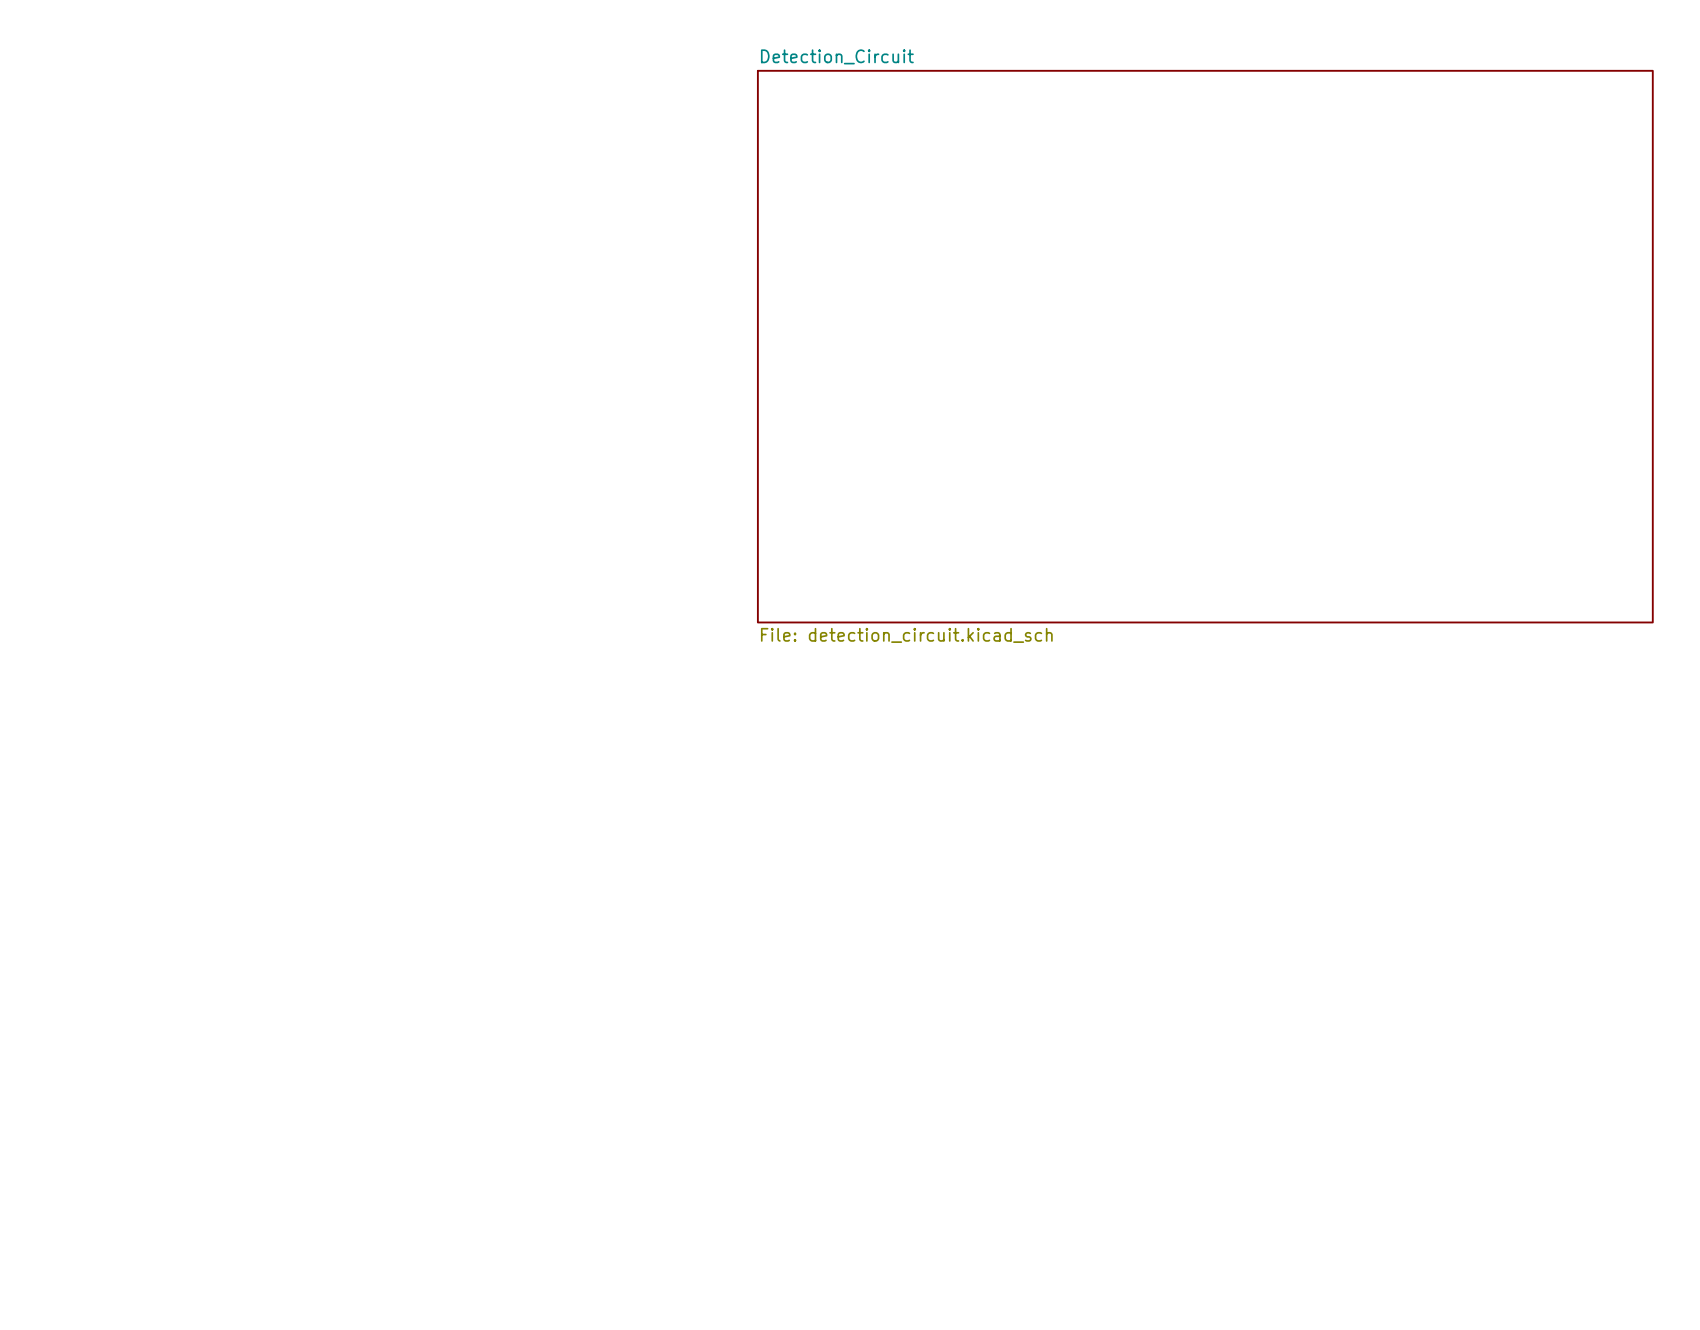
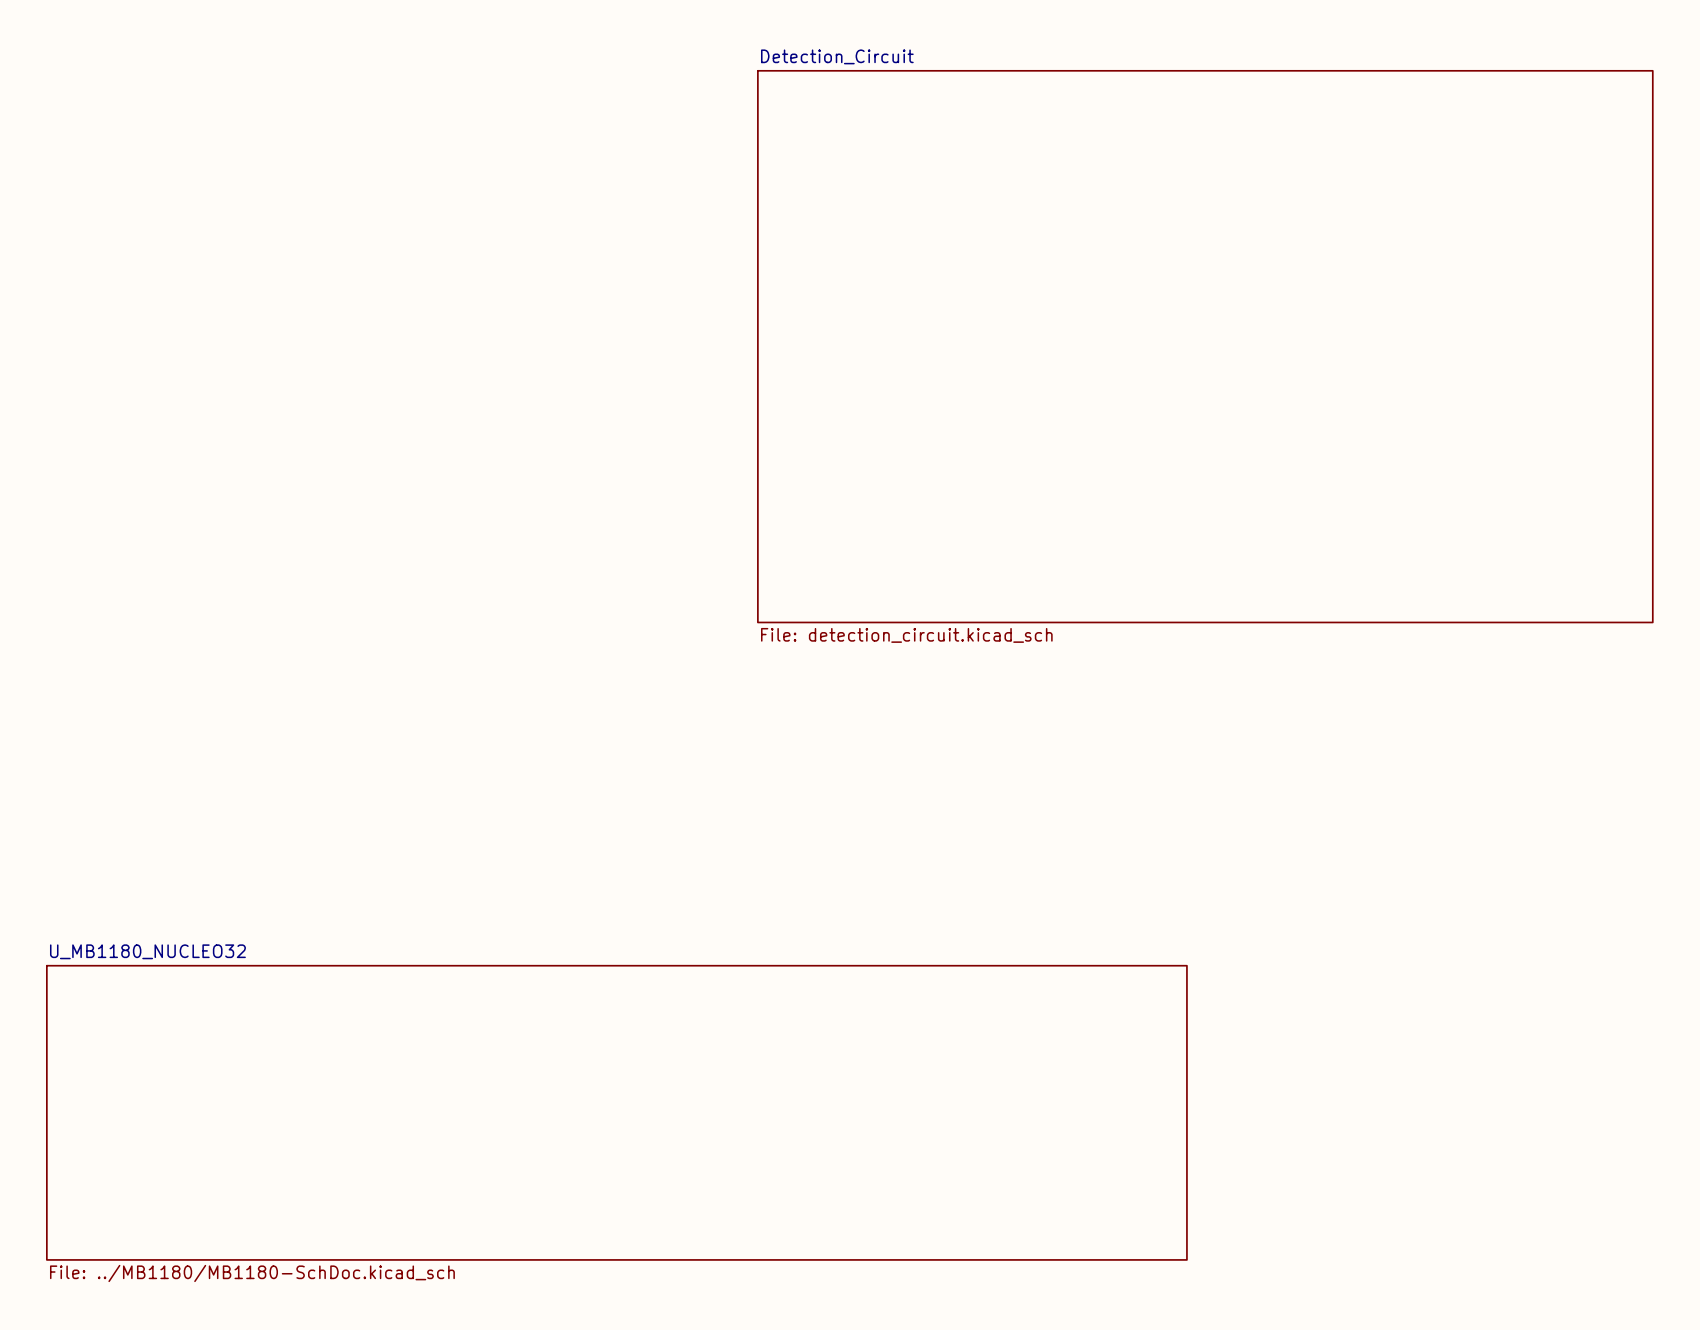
sheet U_MB1180_NUCLEO32: none -> File: ../MB1180/MB1180-SchDoc.kicad_sch (616, 1112)

